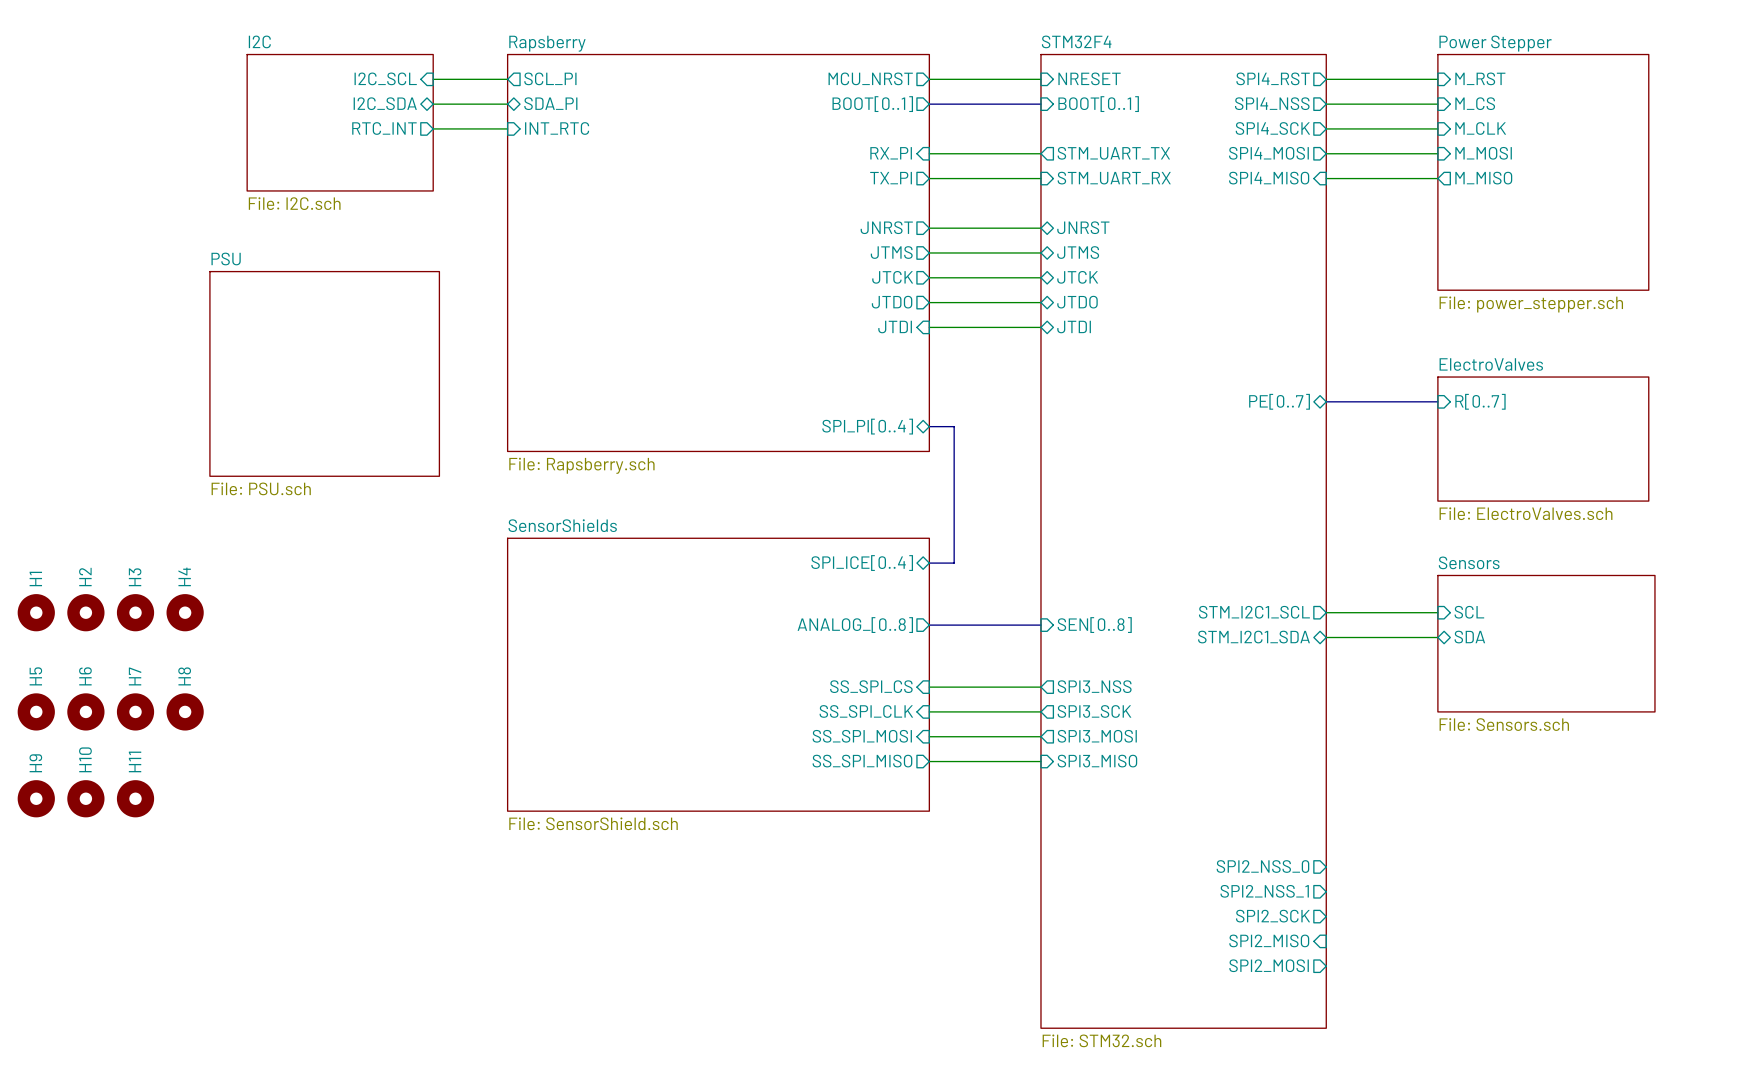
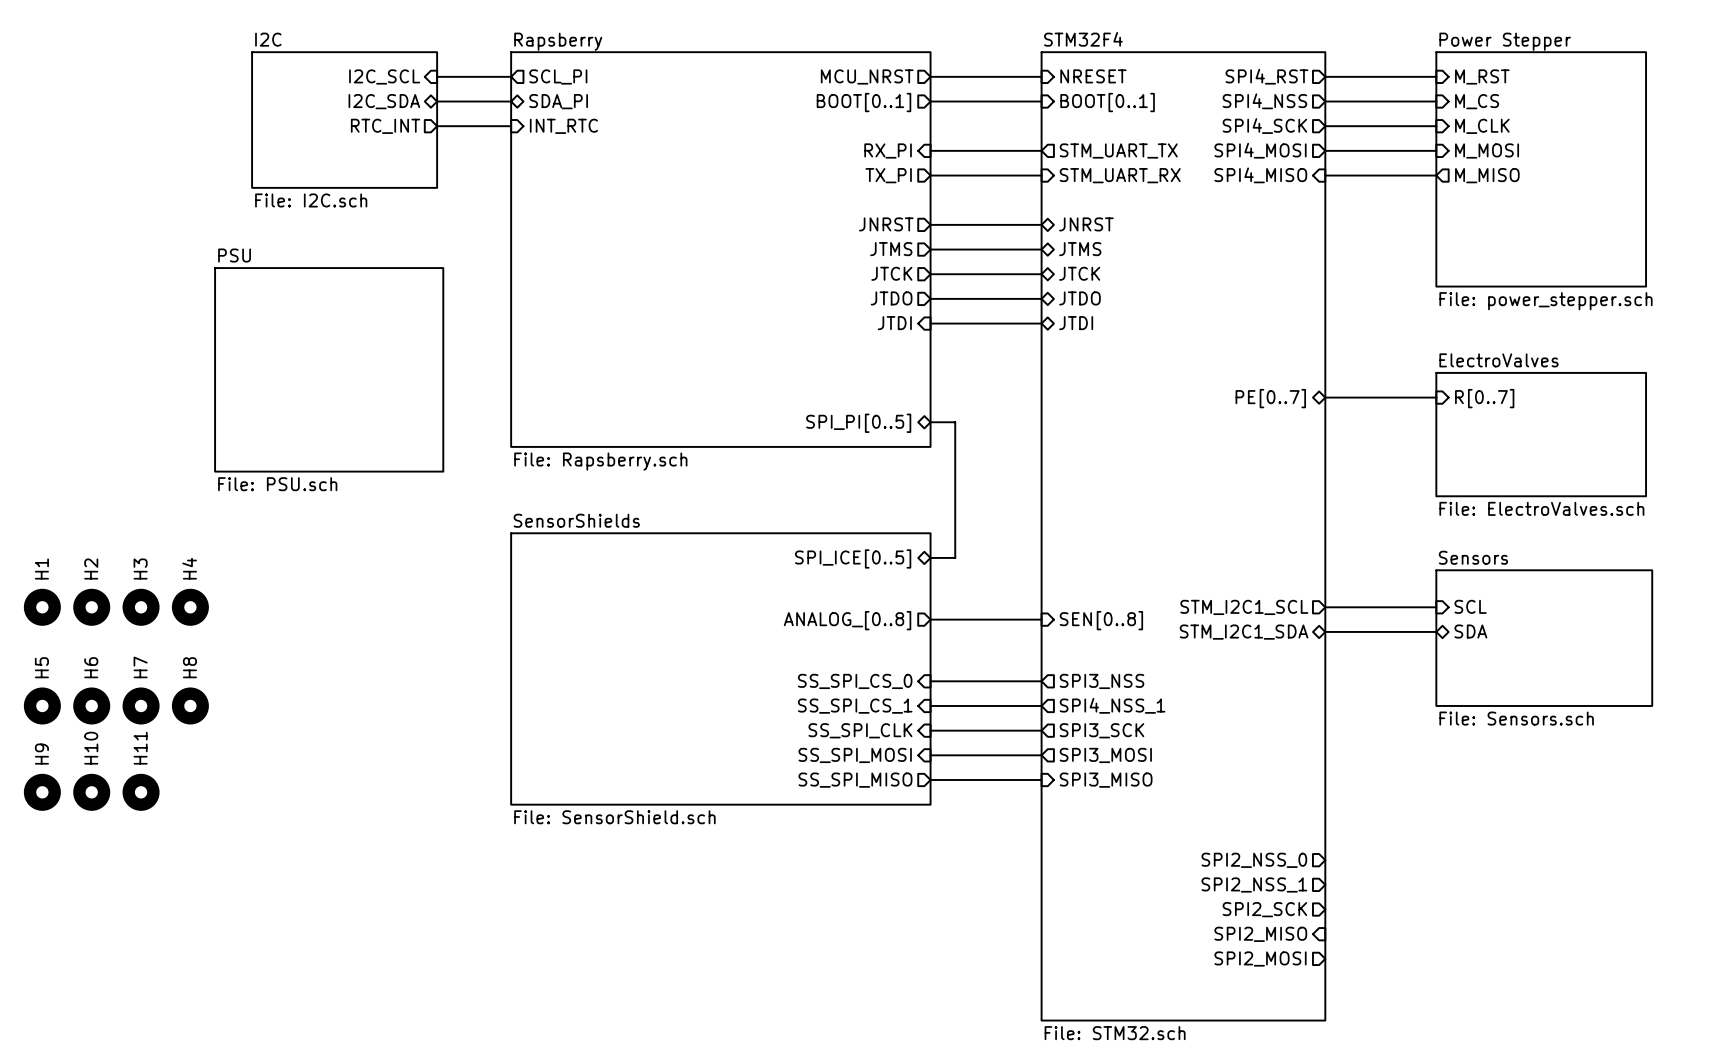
sheet pin: SPI_PI[0..4] (867, 426) -> SPI_PI[0..5] (858, 423)
sheet pin: SPI_ICE[0..4] (862, 563) -> SPI_ICE[0..5] (853, 558)
sheet pin: SS_SPI_CS (871, 686) -> SS_SPI_CS_0 (855, 681)
sheet pin: SS_SPI_CLK (866, 711) -> SS_SPI_CS_1 (855, 706)
sheet pin: SPI3_SCK (1094, 711) -> SPI4_NSS_1 (1112, 705)
sheet pin: SS_SPI_MOSI (862, 736) -> SS_SPI_CLK (860, 730)
sheet pin: SPI3_MOSI (1097, 736) -> SPI3_SCK (1101, 730)
sheet pin shape: output (862, 761) -> input (855, 755)
sheet pin: SS_SPI_MISO (862, 761) -> SS_SPI_MOSI (855, 755)
sheet pin shape: input (1097, 761) -> output (1105, 755)
sheet pin: SPI3_MISO (1097, 761) -> SPI3_MOSI (1105, 755)
sheet pin: none -> SS_SPI_MISO (855, 780)
sheet pin: none -> SPI3_MISO (1106, 780)
wire: none -> (930, 780) (1041, 780)

